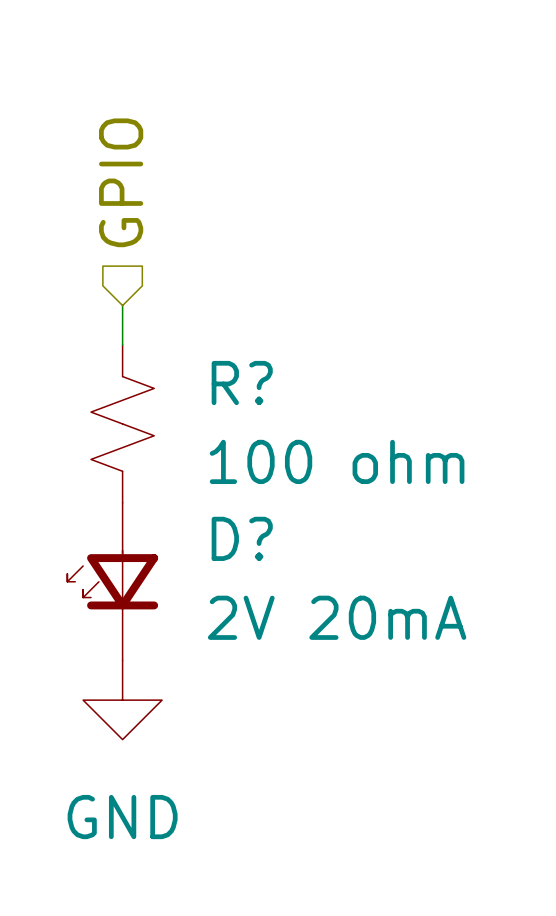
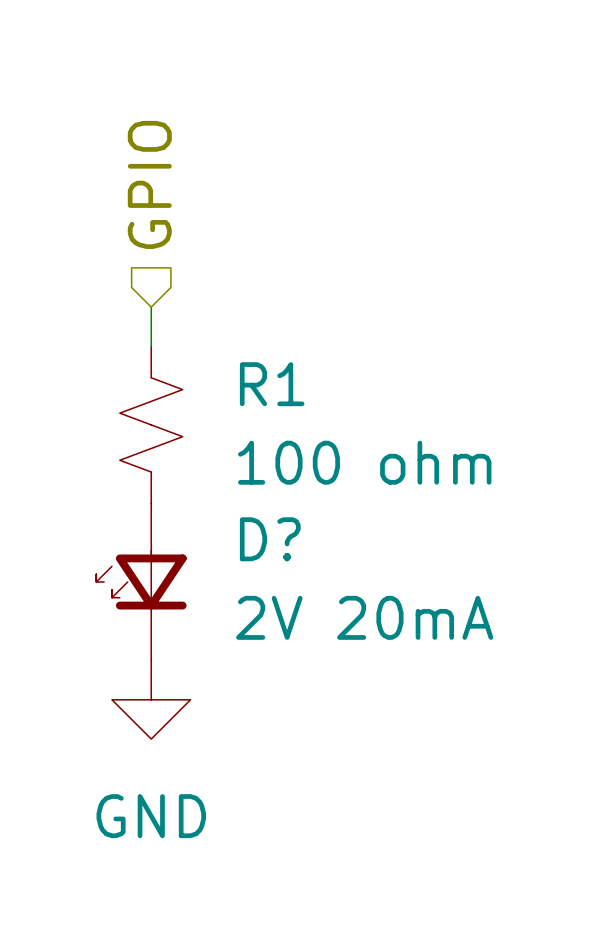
R? name: R? (242, 383) -> R1 (272, 384)

